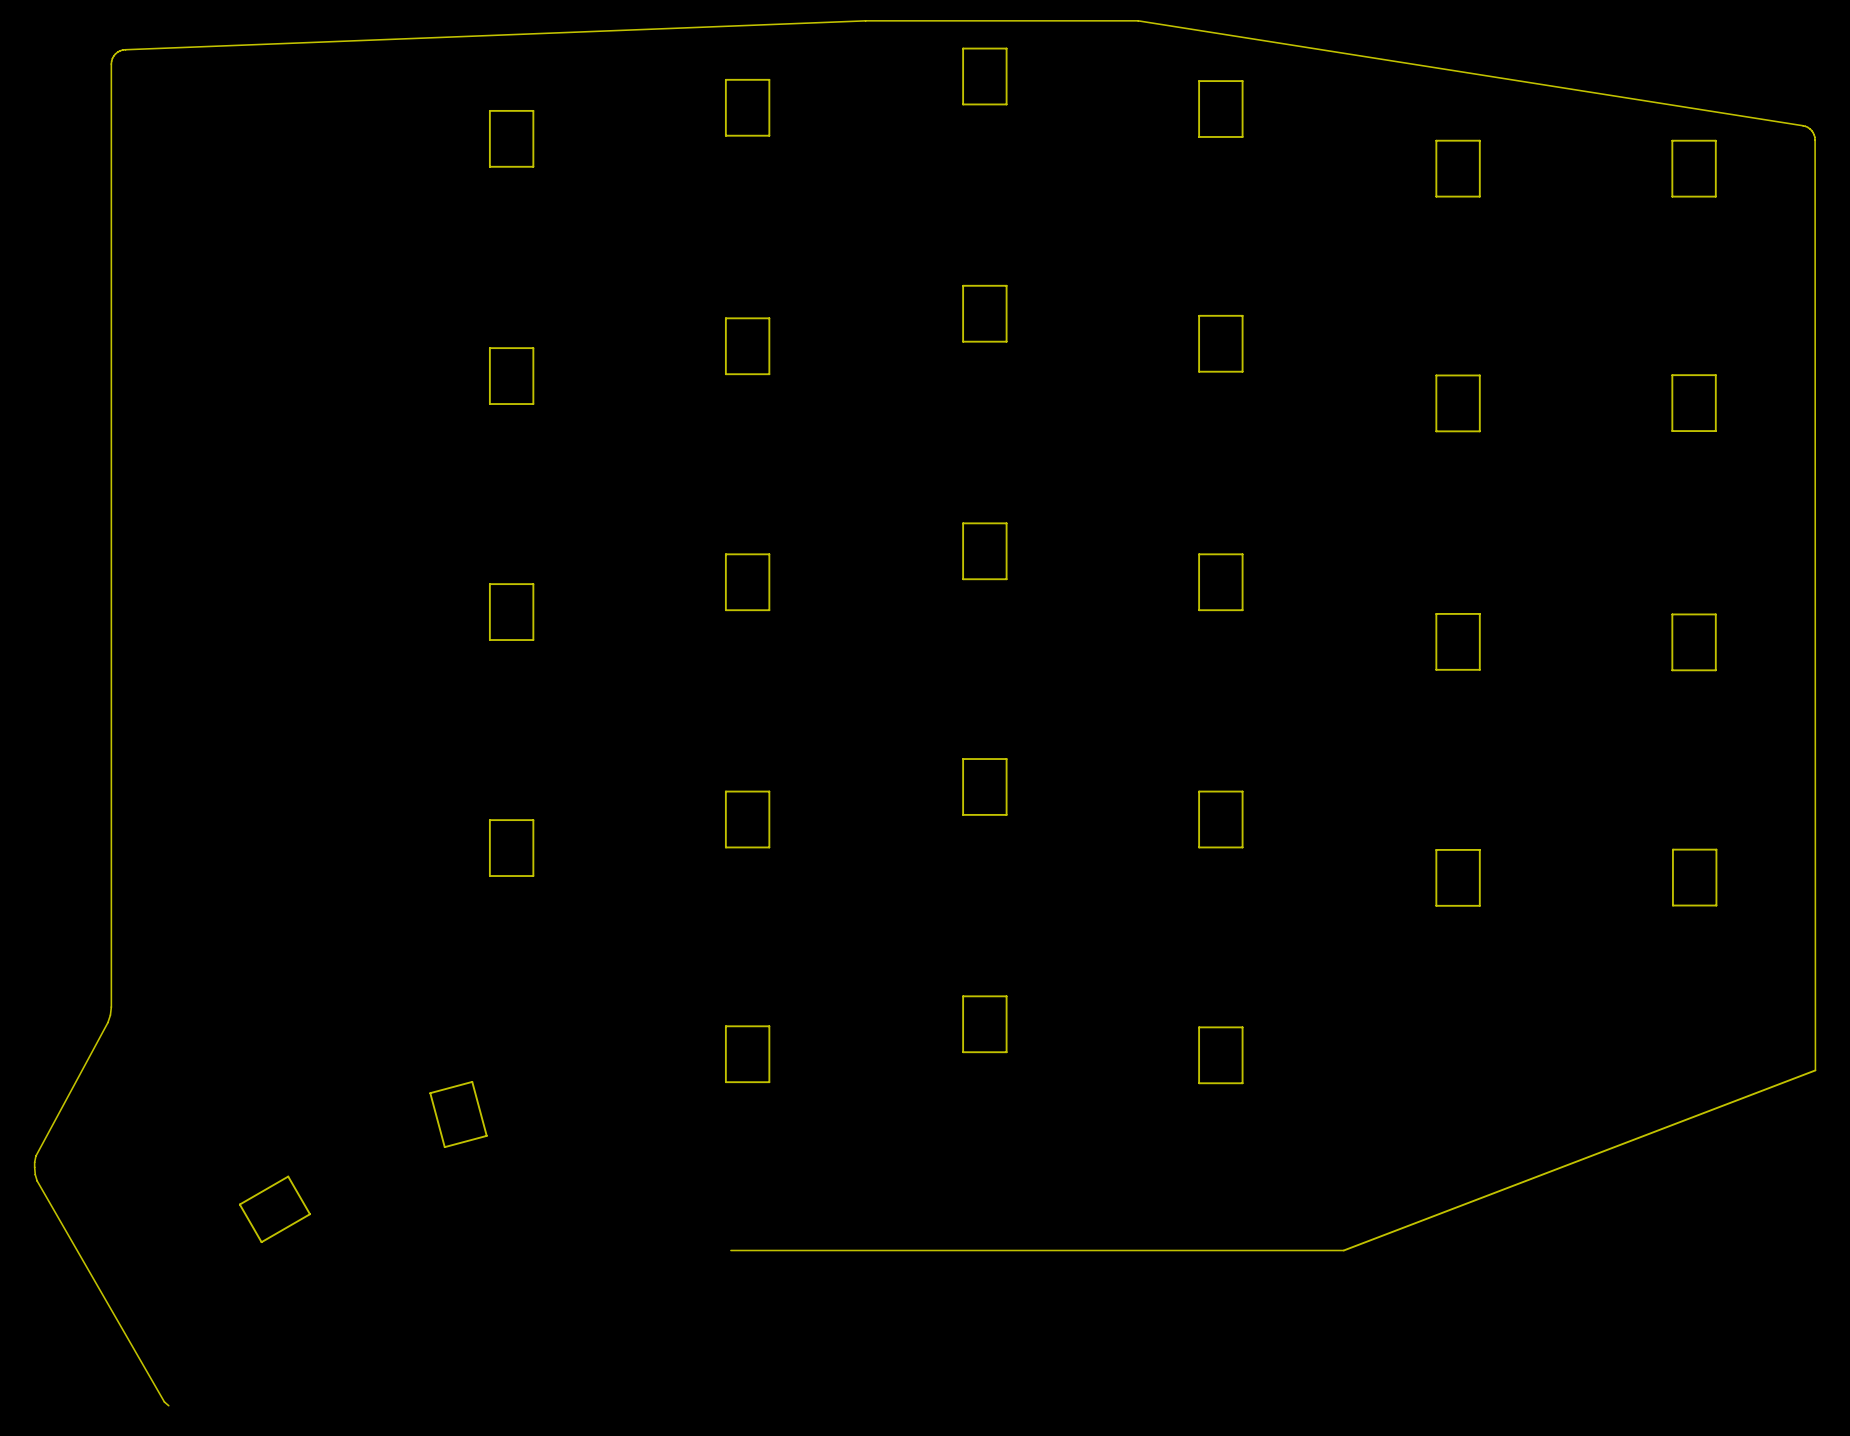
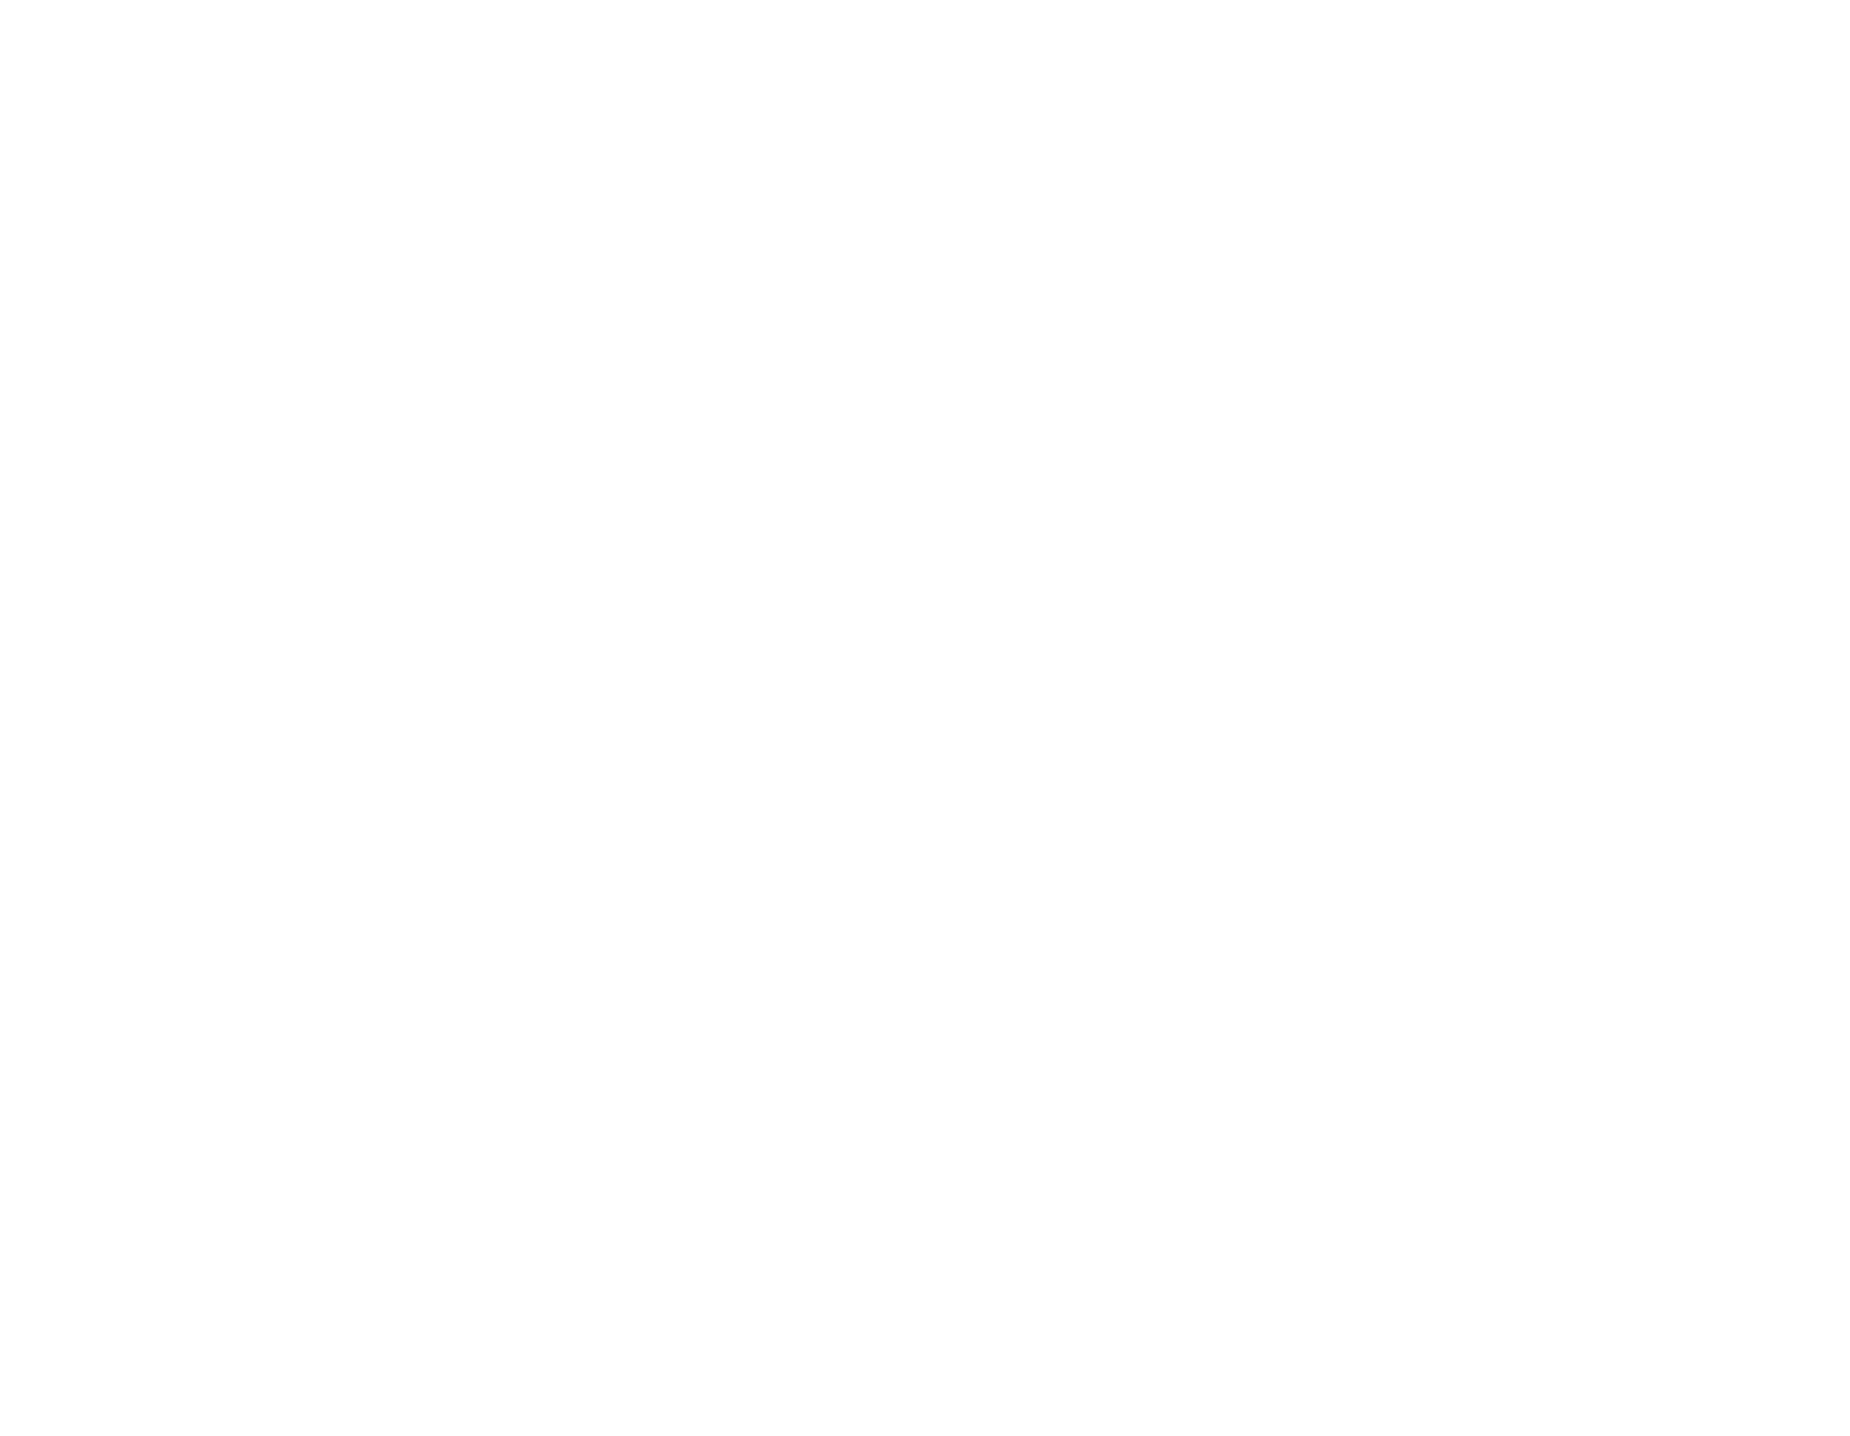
board edge: (963, 48) (963, 104) (1006, 104) (1006, 48) (963, 48) -> none
board edge: (725, 79) (725, 135) (769, 135) (769, 79) (725, 79) -> none
board edge: (1199, 81) (1199, 136) (1242, 136) (1242, 81) (1199, 81) -> none
board edge: (489, 110) (489, 166) (533, 166) (533, 110) (489, 110) -> none
board edge: (1436, 140) (1479, 140) (1479, 196) (1436, 196) (1436, 140) -> none
board edge: (1672, 140) (1715, 140) (1715, 196) (1672, 196) (1672, 140) -> none
board edge: (963, 285) (963, 341) (1006, 341) (1006, 285) (963, 285) -> none
board edge: (1199, 315) (1199, 371) (1242, 371) (1242, 315) (1199, 315) -> none
board edge: (725, 318) (725, 374) (769, 374) (769, 318) (725, 318) -> none
board edge: (489, 348) (533, 348) (533, 404) (489, 404) (489, 348) -> none
board edge: (1436, 375) (1436, 431) (1479, 431) (1479, 375) (1436, 375) -> none
board edge: (1672, 375) (1672, 431) (1715, 431) (1715, 375) (1672, 375) -> none
board edge: (963, 523) (1006, 523) (1006, 579) (963, 579) (963, 523) -> none
board edge: (725, 554) (769, 554) (769, 610) (725, 610) (725, 554) -> none
board edge: (1199, 554) (1242, 554) (1242, 610) (1199, 610) (1199, 554) -> none
board edge: (489, 584) (489, 640) (533, 640) (533, 584) (489, 584) -> none
board edge: (1436, 613) (1436, 669) (1479, 669) (1479, 613) (1436, 613) -> none
board edge: (1672, 614) (1672, 670) (1715, 670) (1715, 614) (1672, 614) -> none
board edge: (963, 759) (1006, 759) (1006, 814) (963, 814) (963, 759) -> none
board edge: (725, 791) (725, 847) (769, 847) (769, 791) (725, 791) -> none
board edge: (1199, 791) (1242, 791) (1242, 847) (1199, 847) (1199, 791) -> none
board edge: (489, 820) (533, 820) (533, 876) (489, 876) (489, 820) -> none
board edge: (1436, 849) (1479, 849) (1479, 905) (1436, 905) (1436, 849) -> none
board edge: (1672, 849) (1672, 905) (1716, 905) (1716, 849) (1672, 849) -> none
board edge: (963, 996) (1006, 996) (1006, 1052) (963, 1052) (963, 996) -> none
board edge: (725, 1026) (725, 1082) (769, 1082) (769, 1026) (725, 1026) -> none
board edge: (1199, 1027) (1242, 1027) (1242, 1083) (1199, 1083) (1199, 1027) -> none
board edge: (472, 1081) (430, 1093) (444, 1147) (486, 1135) (472, 1081) -> none
board edge: (288, 1176) (309, 1214) (261, 1242) (239, 1204) (288, 1176) -> none
board edge: (730, 1250) (1343, 1250) (1815, 1070) (1815, 139) (1809, 128) (1803, 125) (1138, 20) (865, 20) (125, 49) (117, 52) (112, 58) (111, 64) (111, 1007) (107, 1022) (35, 1156) (34, 1167) (37, 1180) (164, 1402) (168, 1405) -> none

